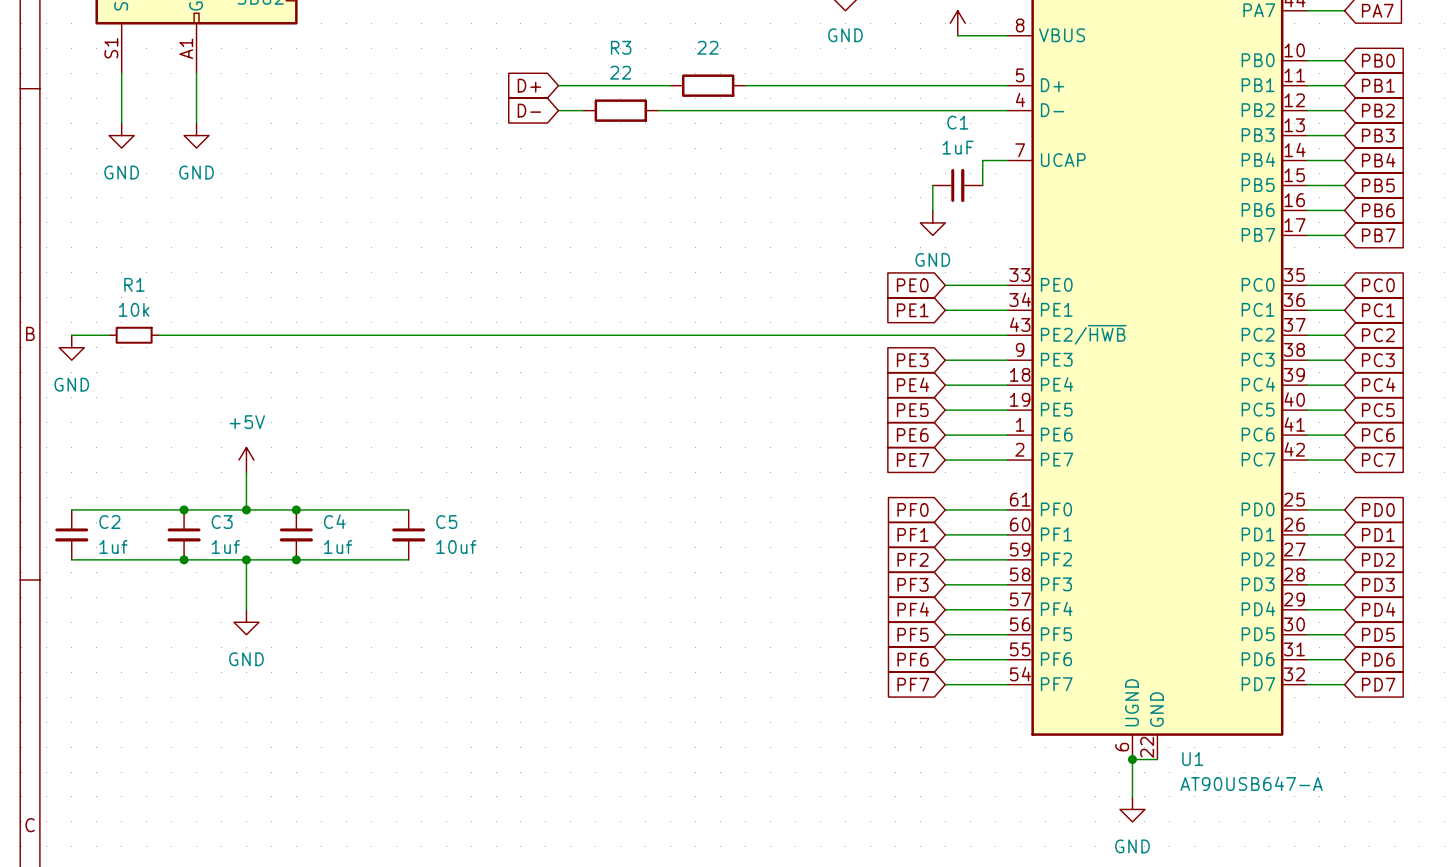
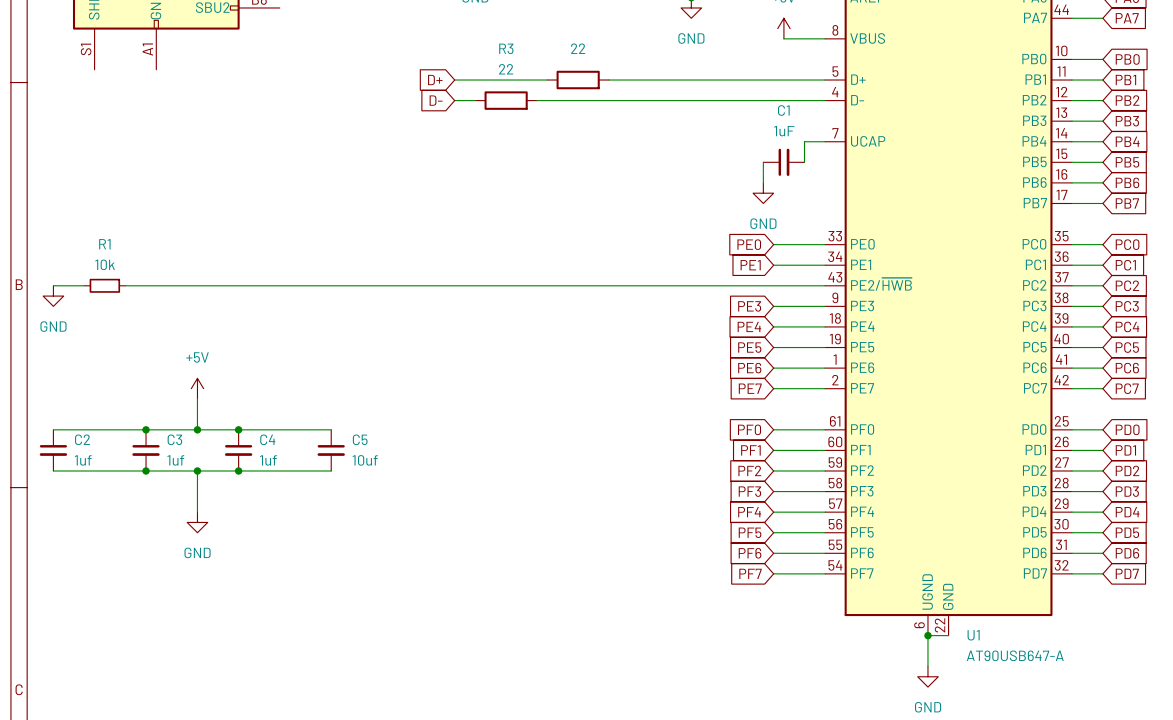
wire: (121, 73) (121, 123) -> none
wire: (196, 73) (196, 123) -> none
power symbol: GND (121, 135) -> none
power symbol: GND (196, 135) -> none

